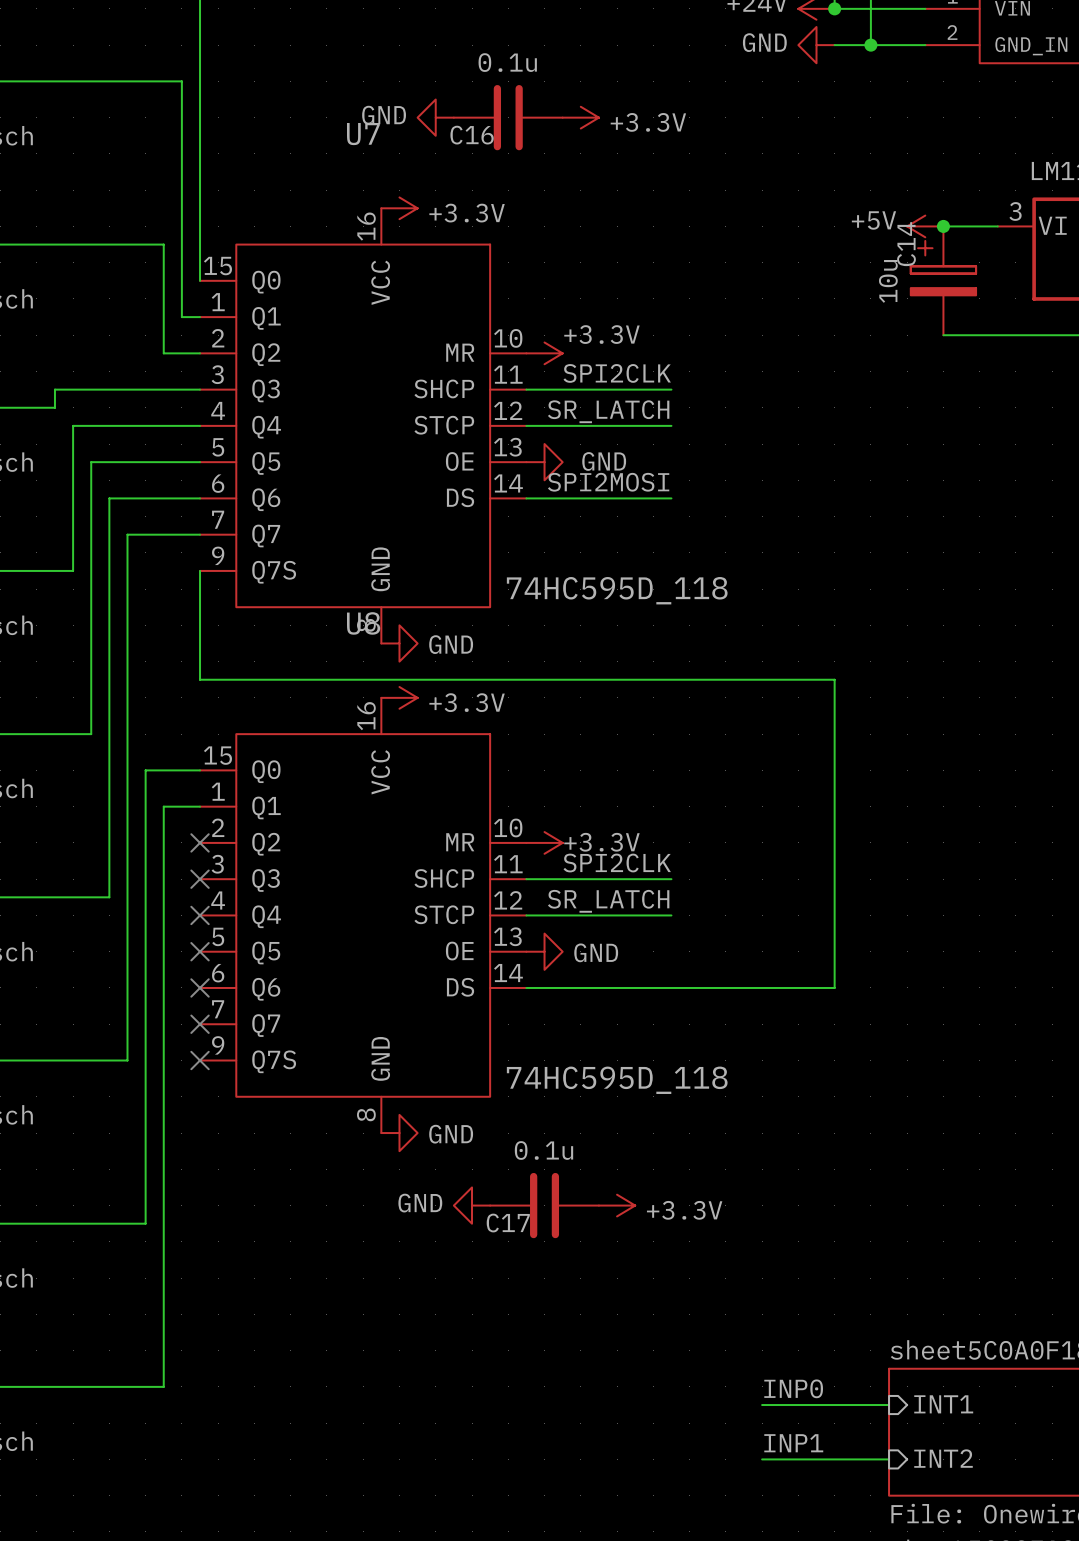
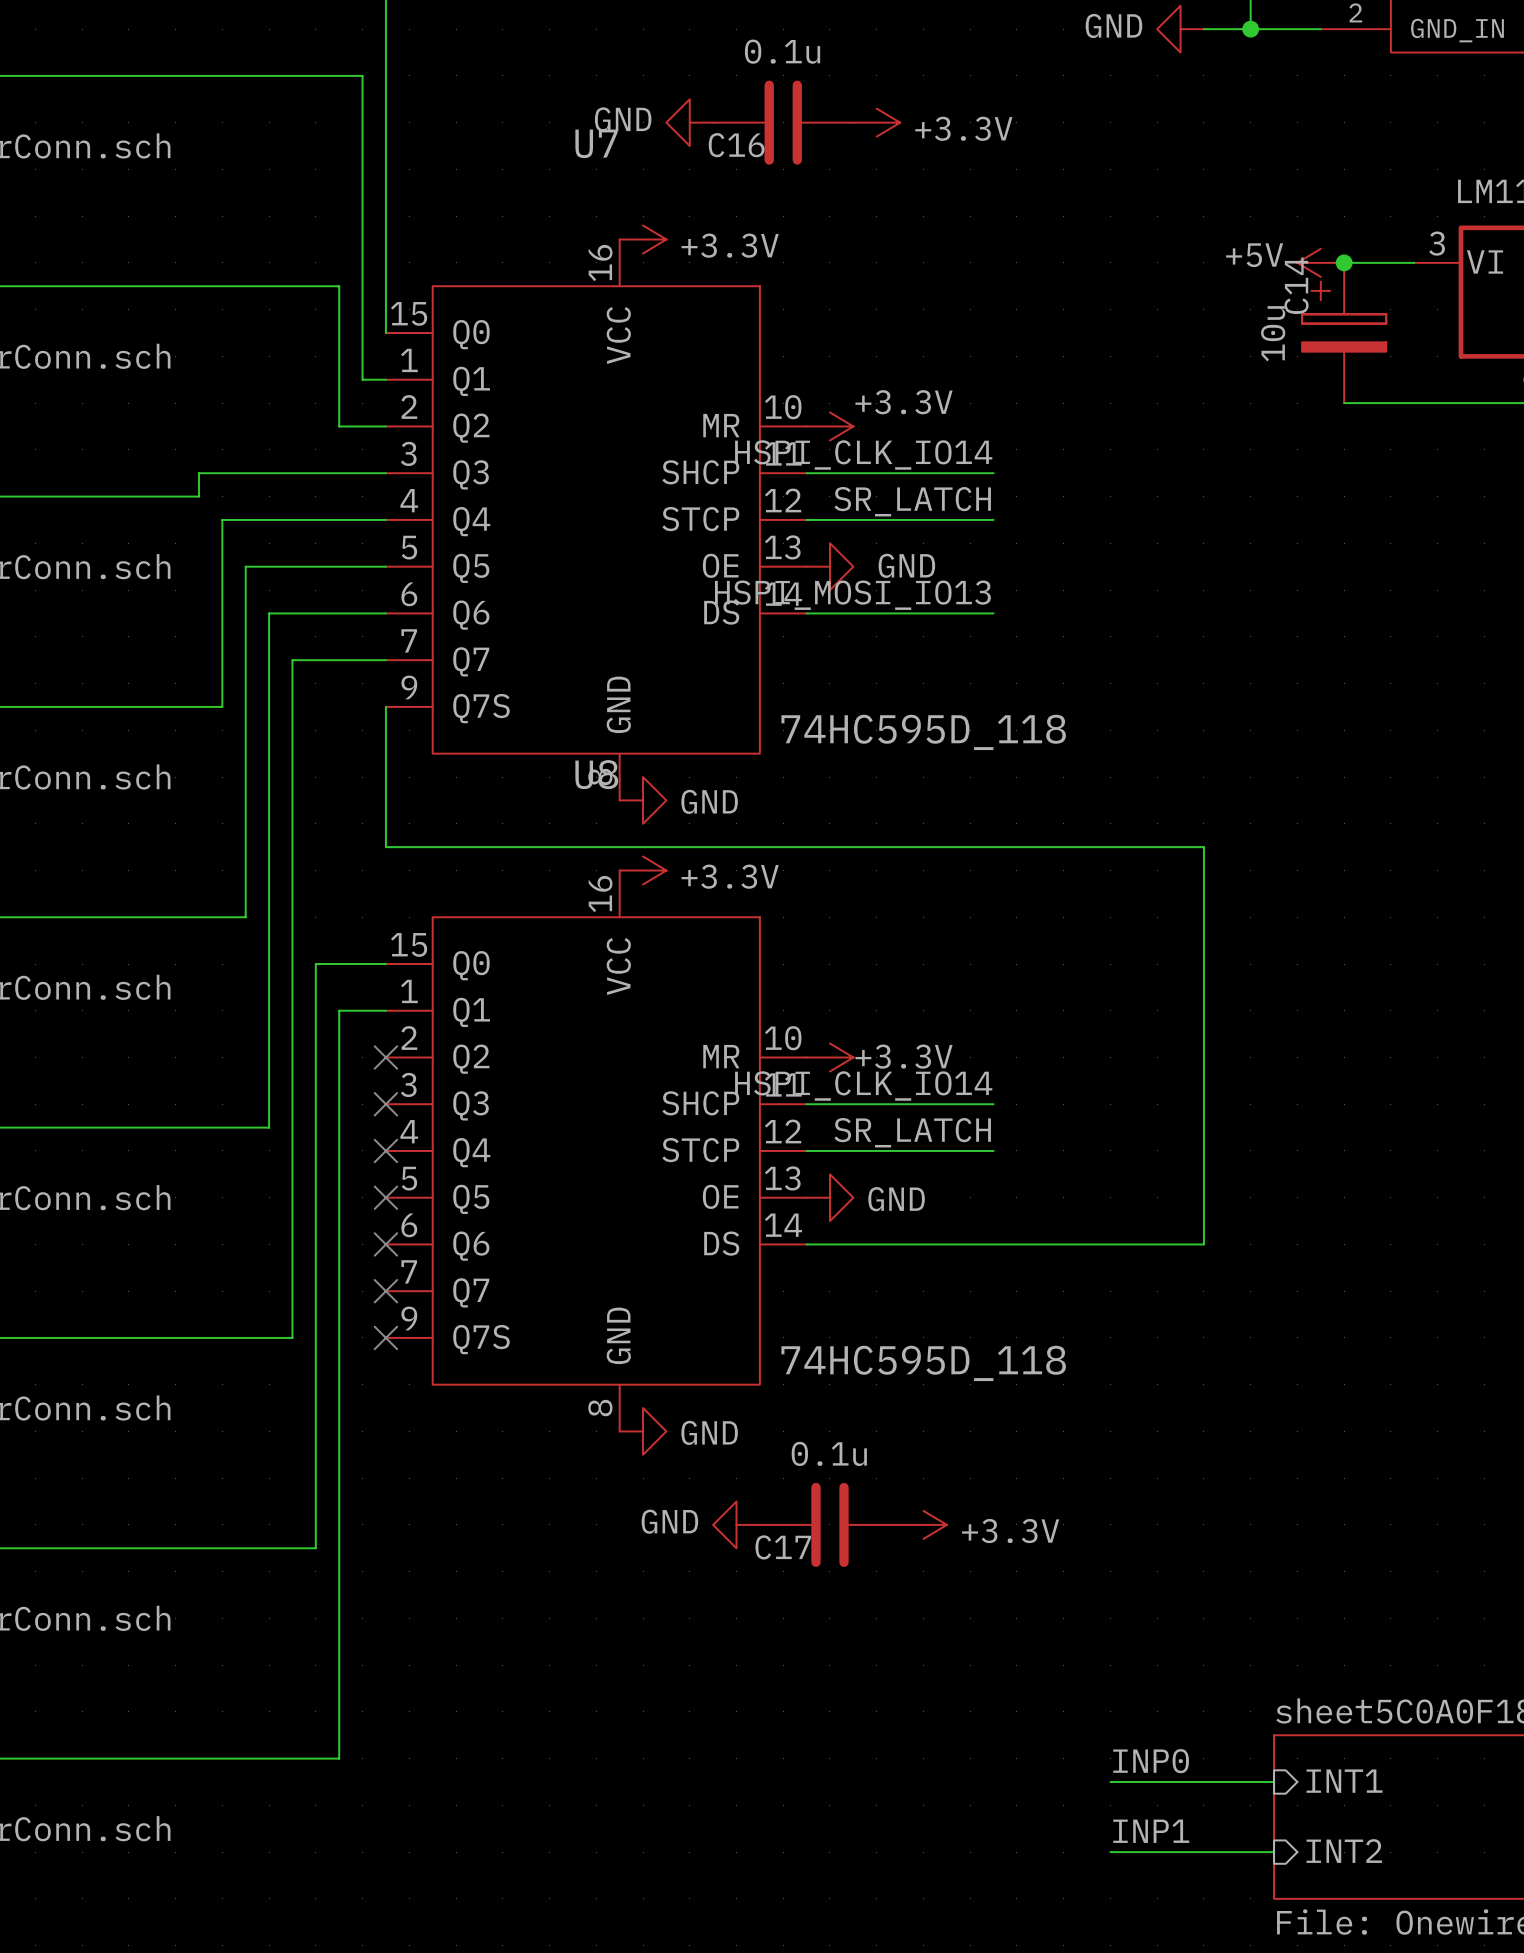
label: SPI2CLK (617, 373) -> HSPI_CLK_IO14 (863, 454)
label: SPI2MOSI (608, 482) -> HSPI_MOSI_IO13 (852, 595)
label: SPI2CLK (617, 863) -> HSPI_CLK_IO14 (863, 1086)

